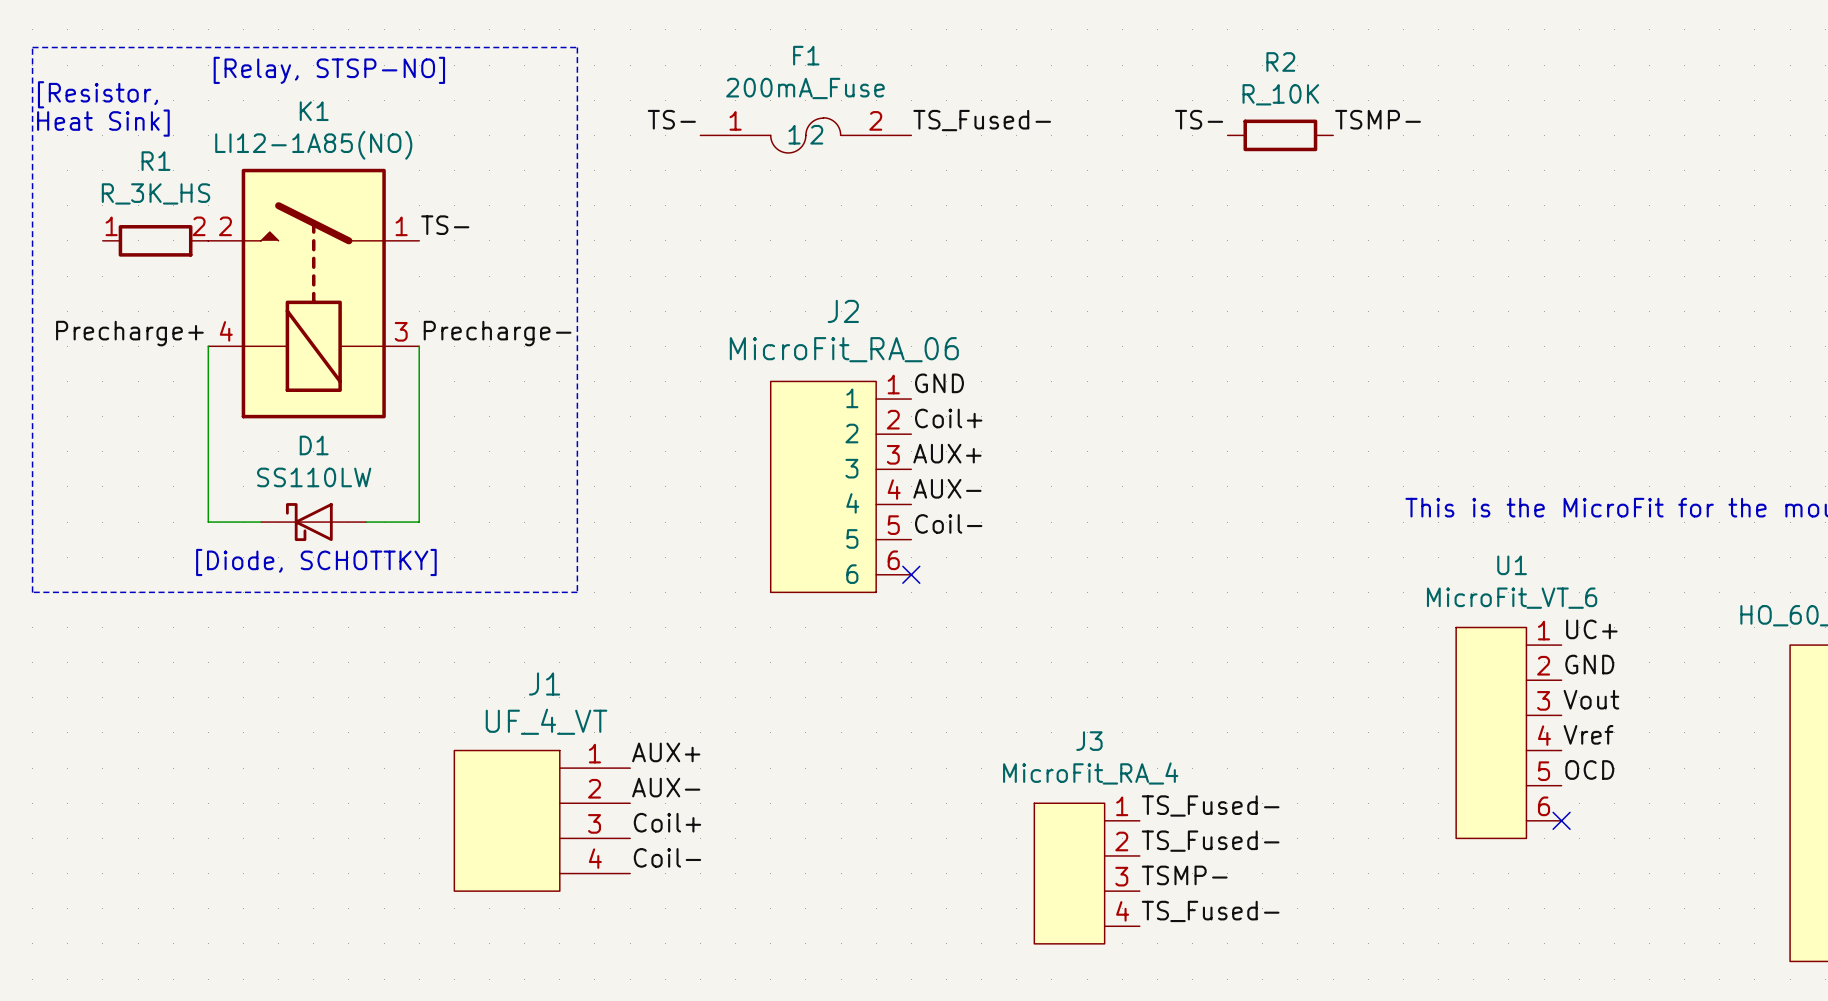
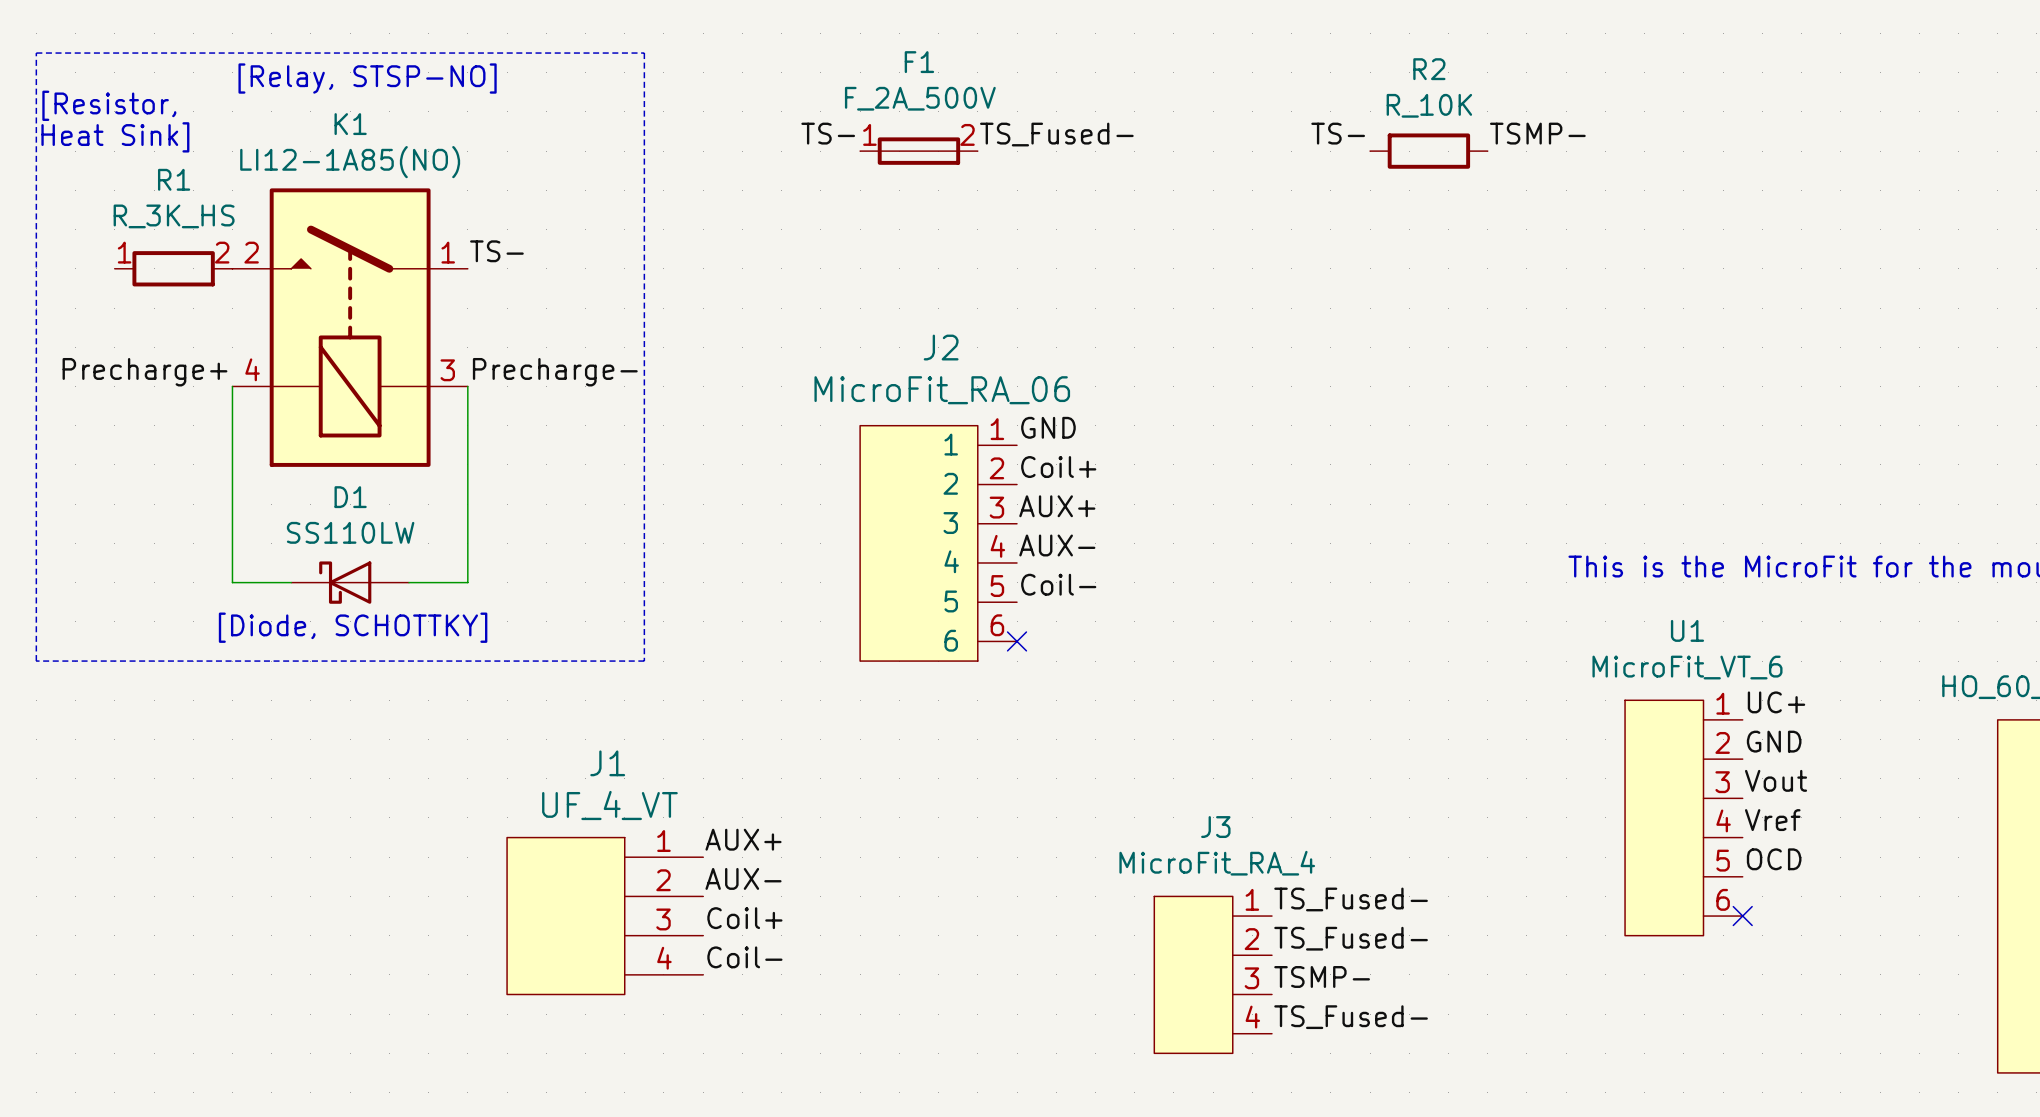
F1 value: 200mA_Fuse (805, 88) -> F_2A_500V (920, 98)
F1 symbol: [700, 117, 912, 153] -> [860, 137, 978, 165]
label position: TS- (671, 119) -> TS- (828, 133)
label position: TS_Fused- (982, 120) -> TS_Fused- (1056, 134)

